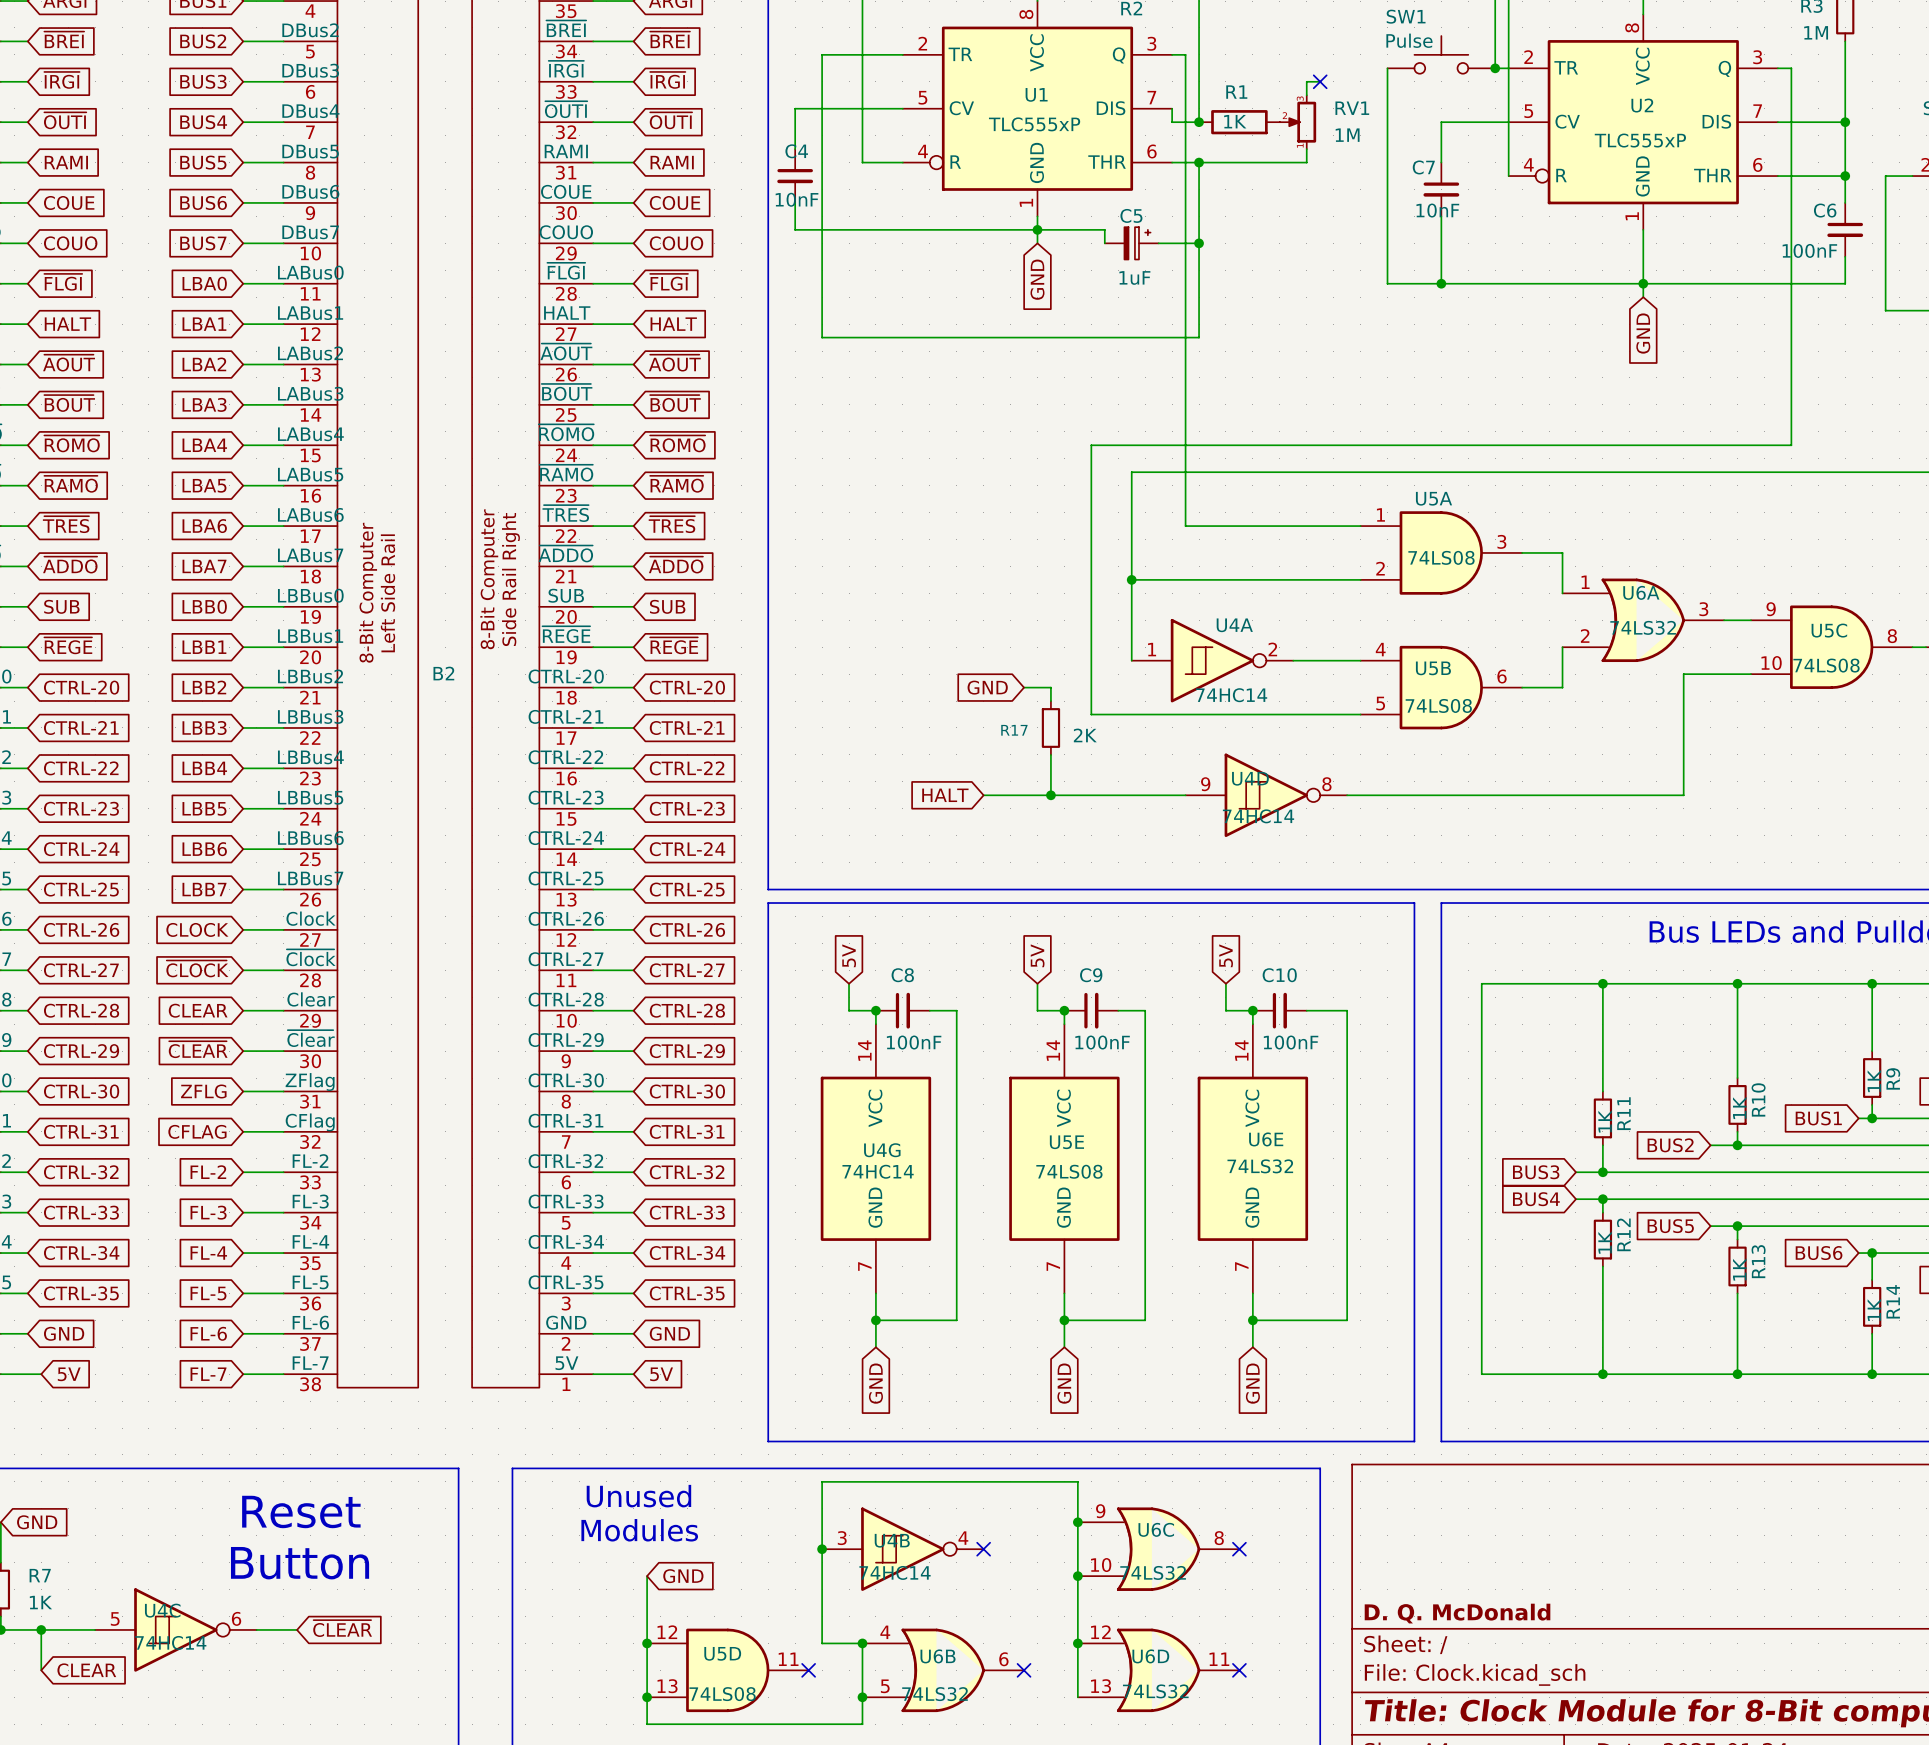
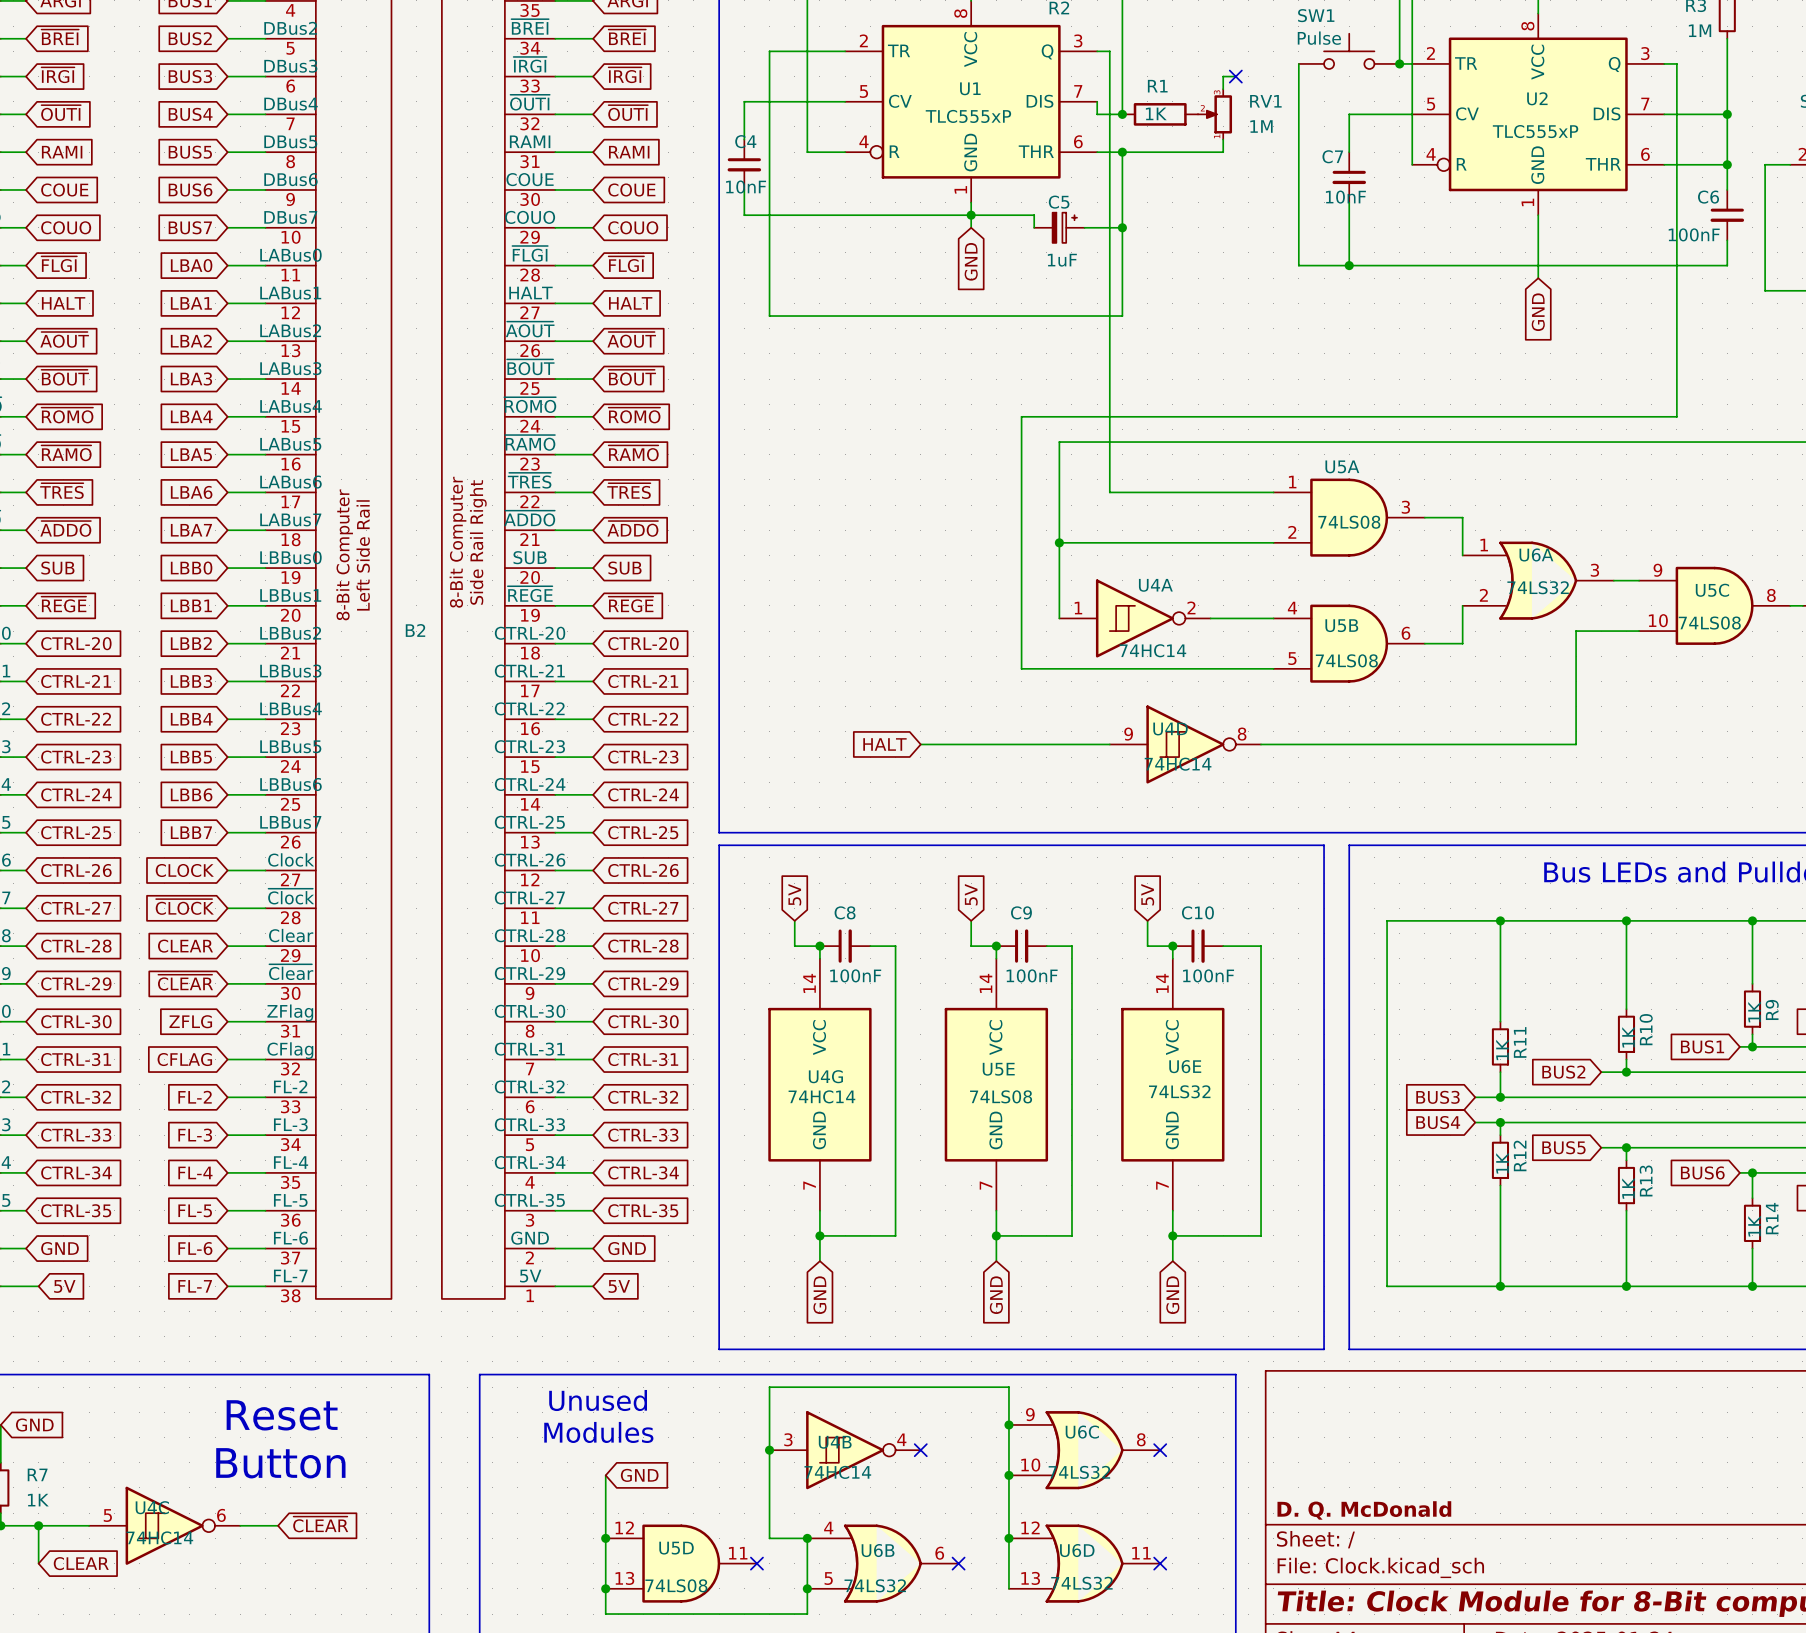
junction: (1643, 283) -> none
global label: GND (987, 687) -> none
wire: (1024, 687) (1050, 687) (1050, 701) -> none
R17: 2K (1050, 727) -> none
wire: (1050, 754) (1050, 795) -> none
junction: (1050, 795) -> none

